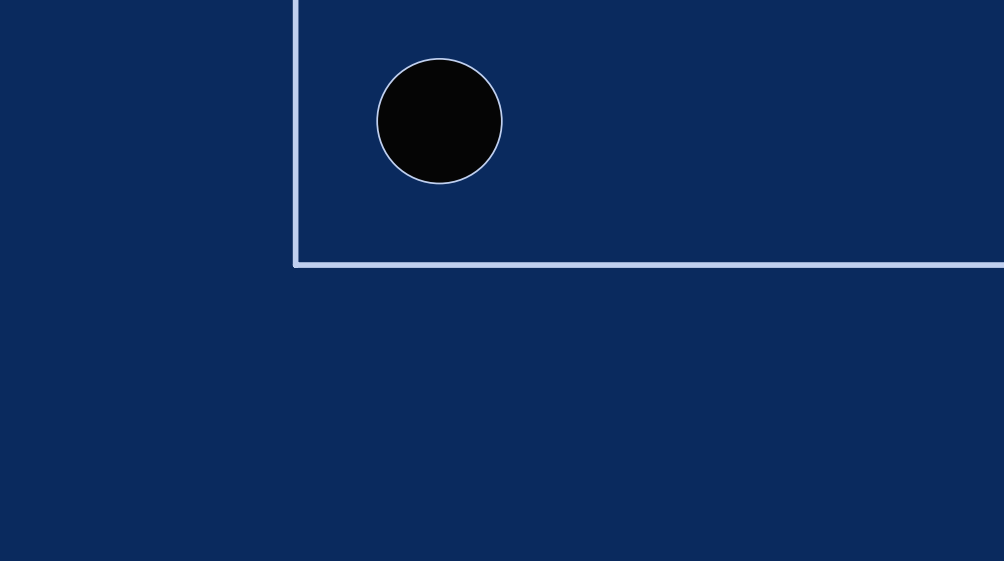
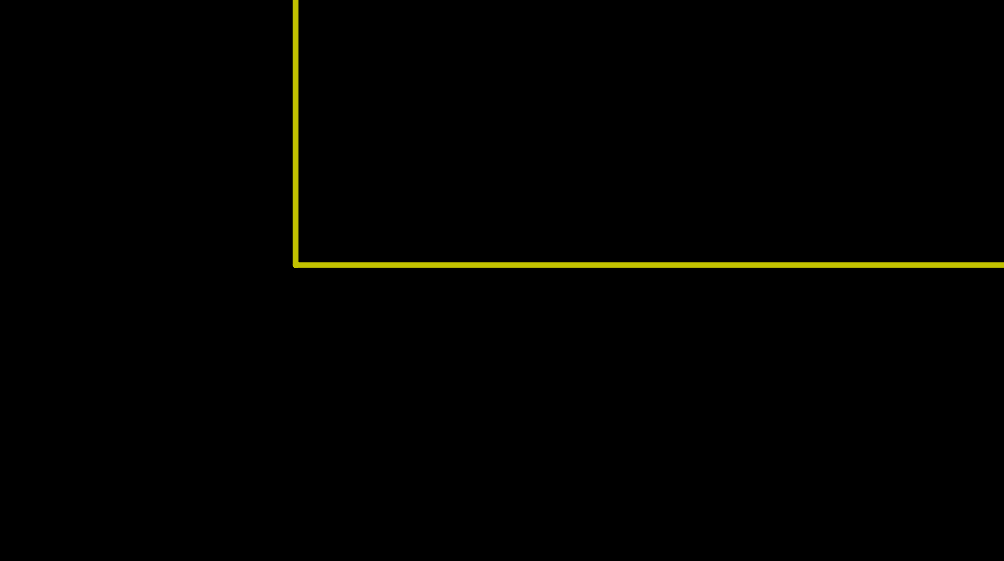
part: (439, 121) -> none

